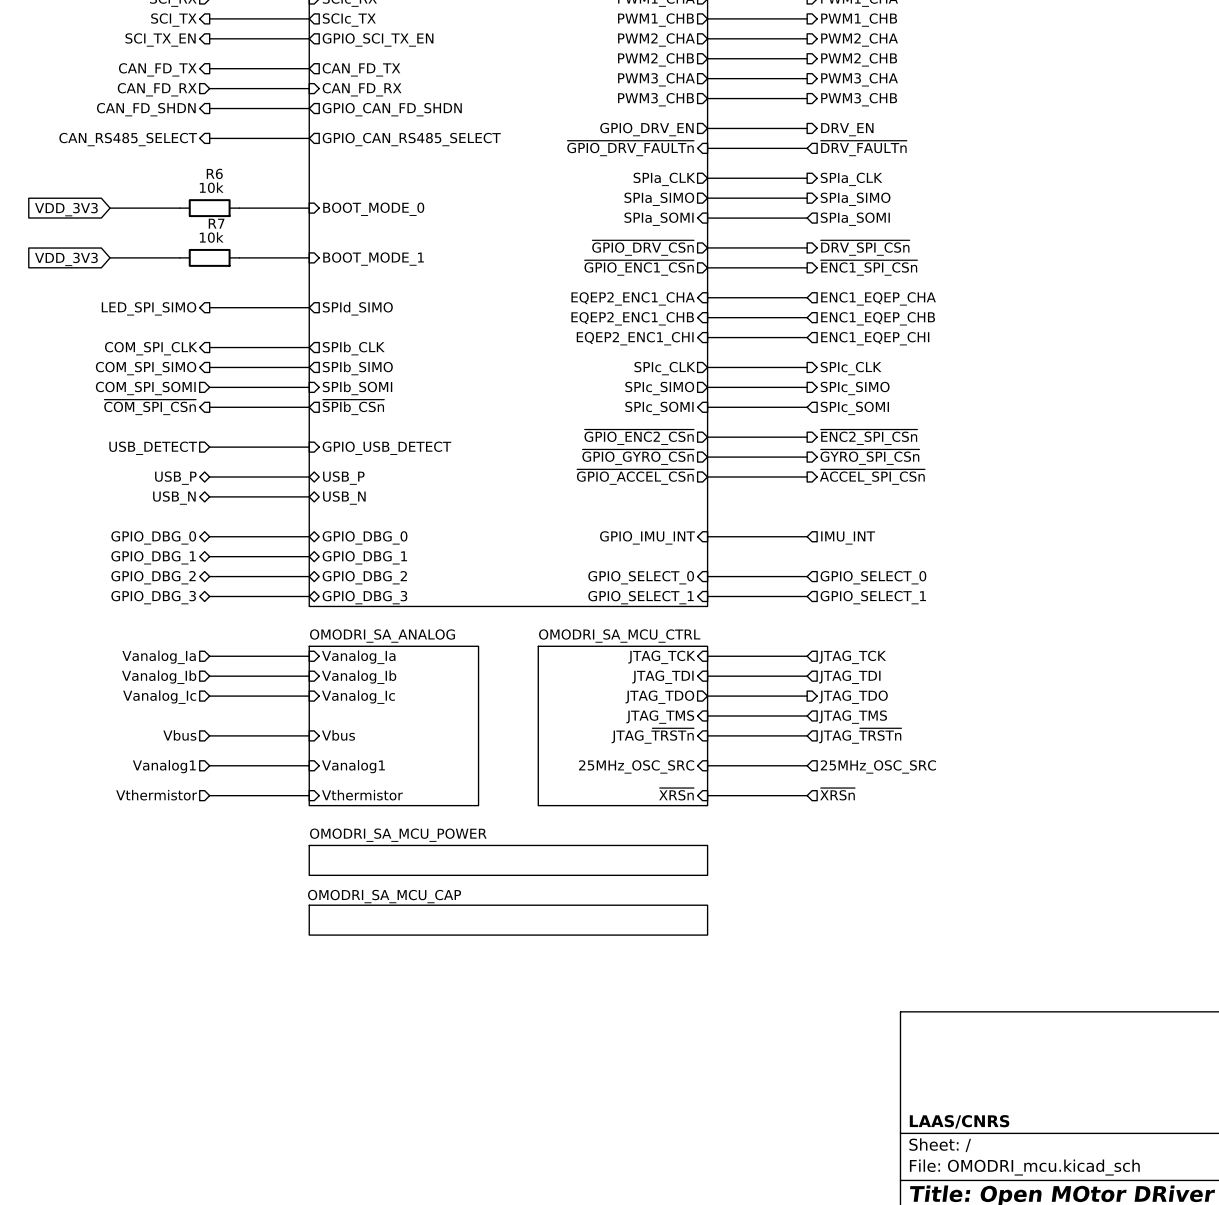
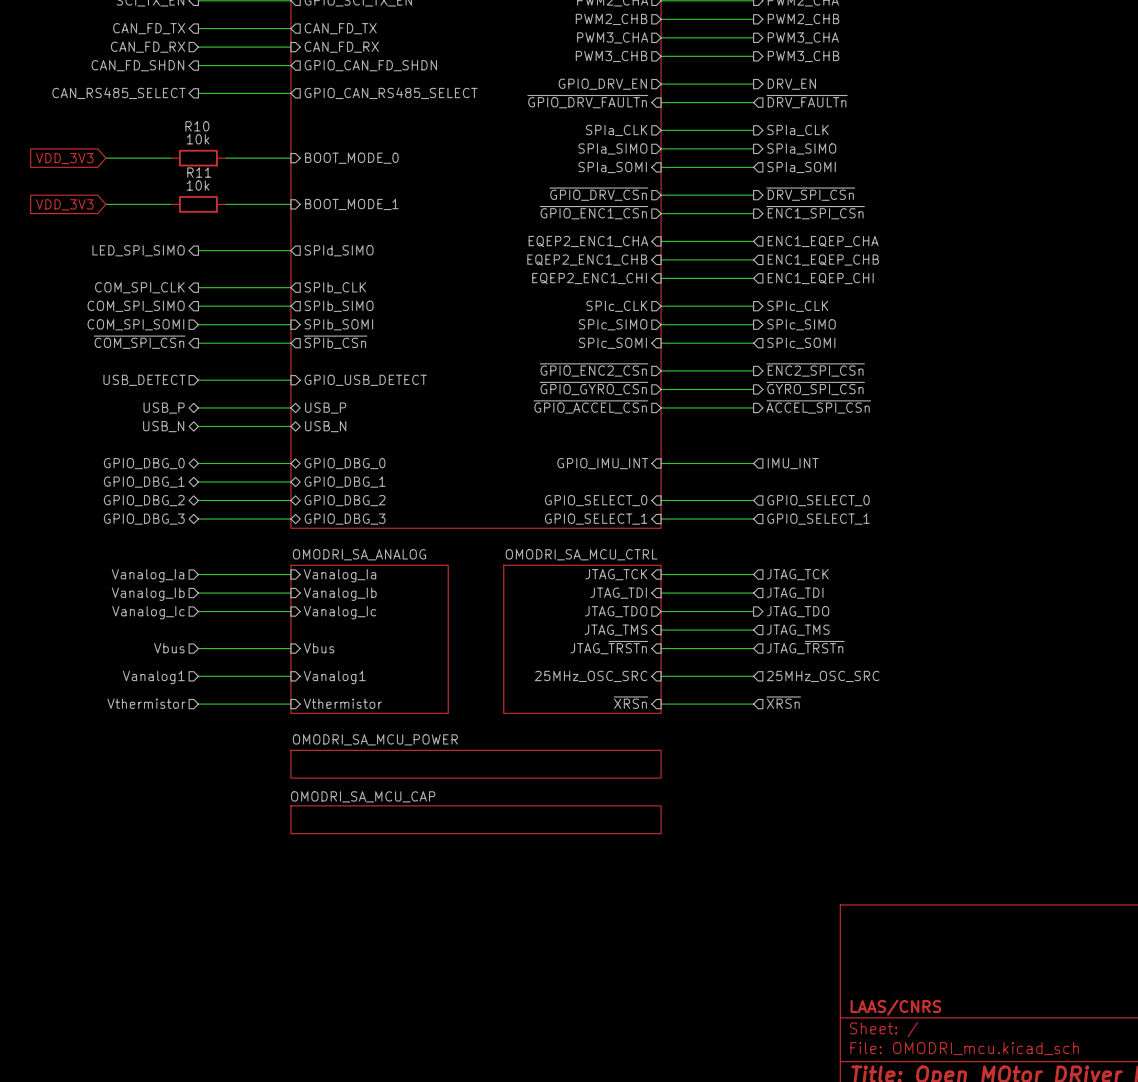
R6 name: R6 (214, 173) -> R10 (197, 126)
R7 name: R7 (216, 223) -> R11 (199, 172)

